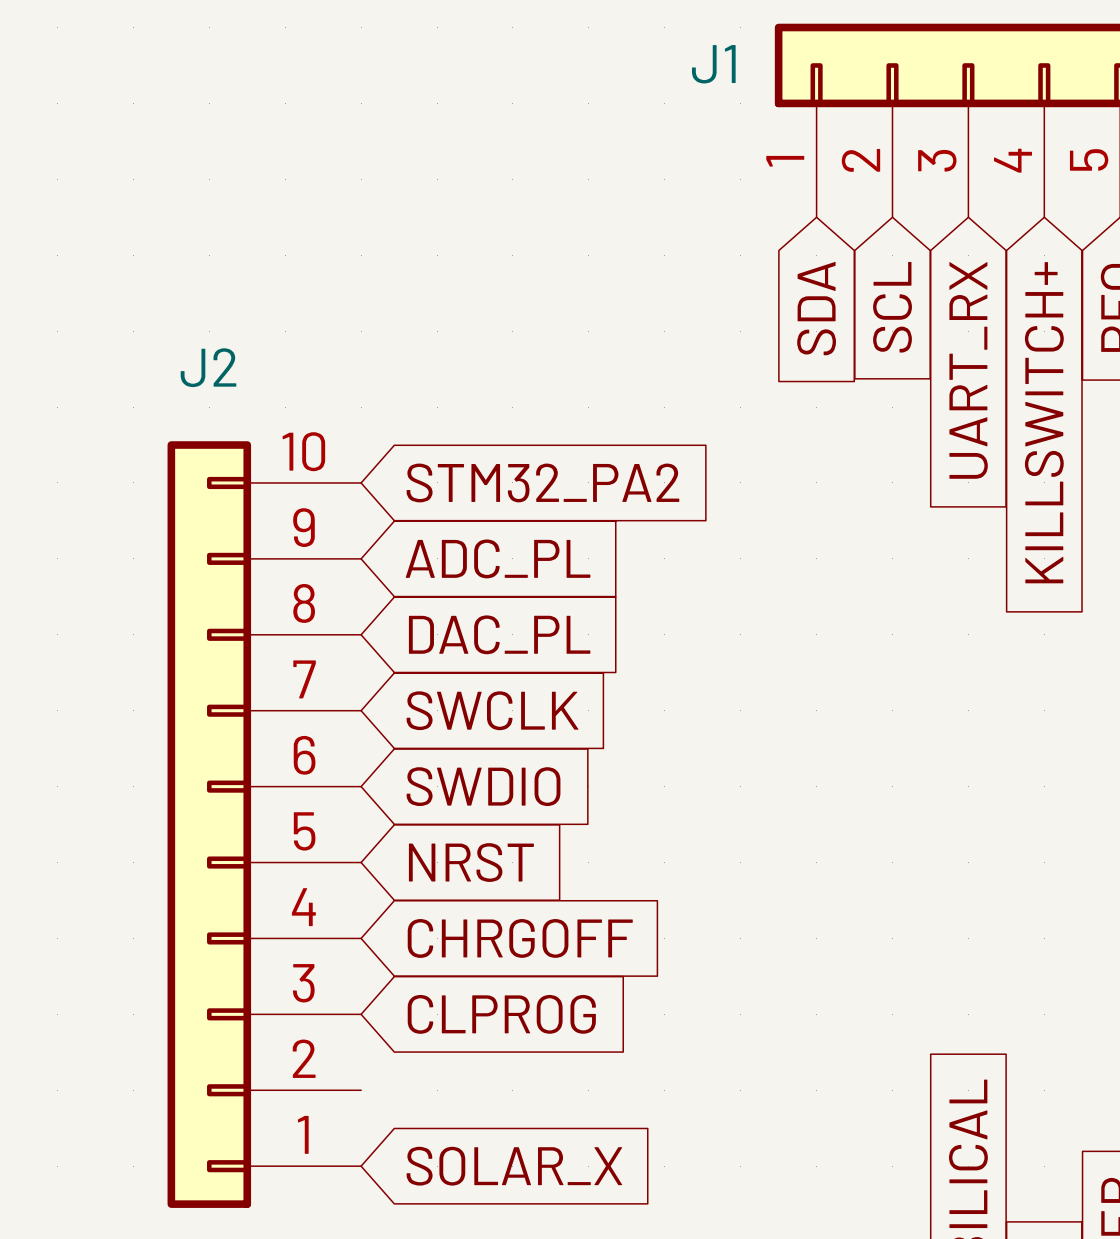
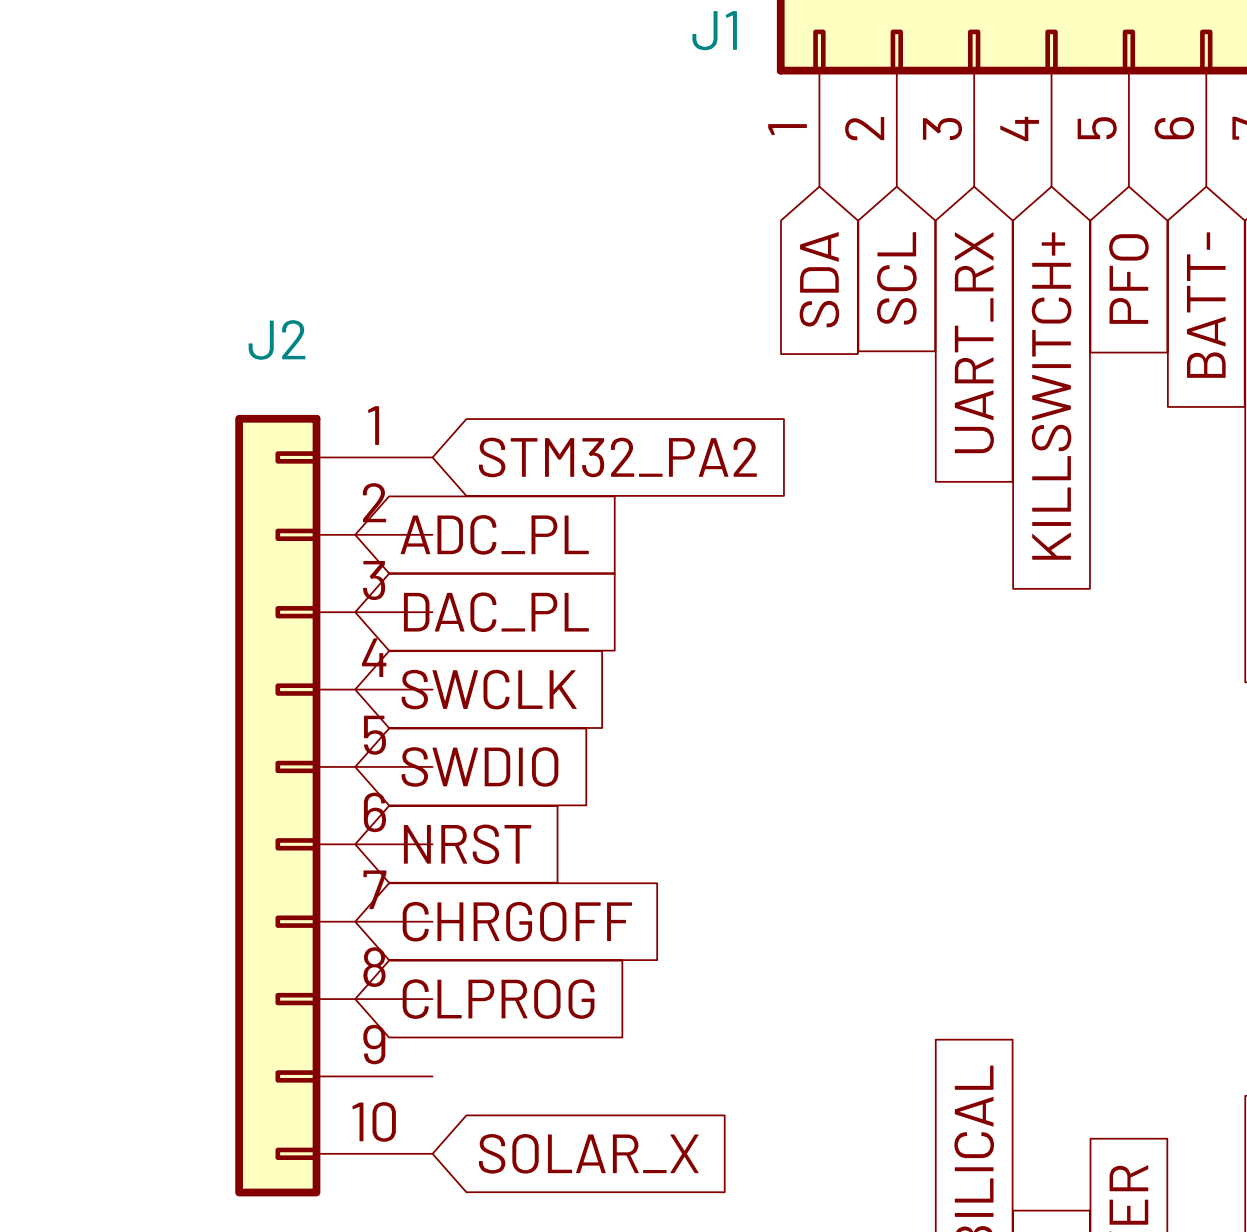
global label position: STM32_PA2 (542, 482) -> STM32_PA2 (617, 457)
J2 flip: as is (209, 824) -> up-down (277, 805)
global label position: SOLAR_X (514, 1166) -> SOLAR_X (588, 1153)

